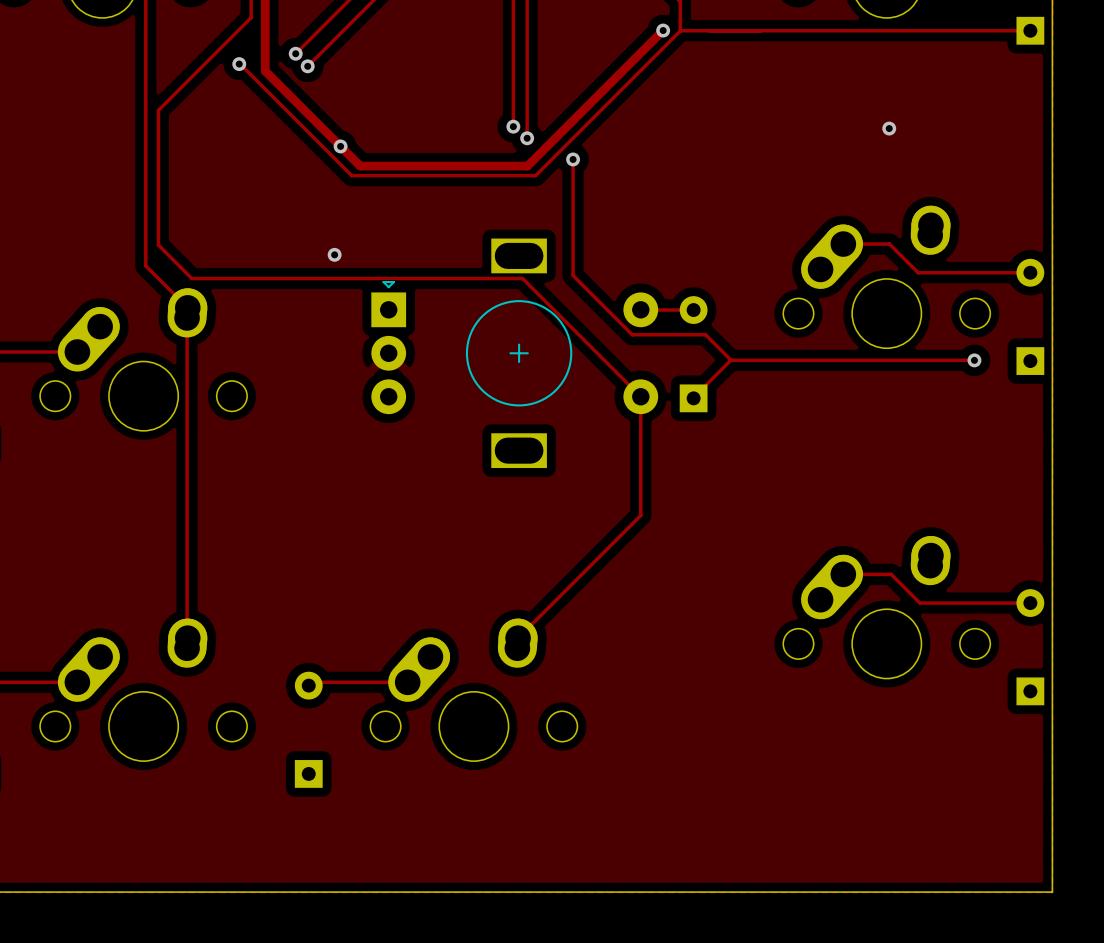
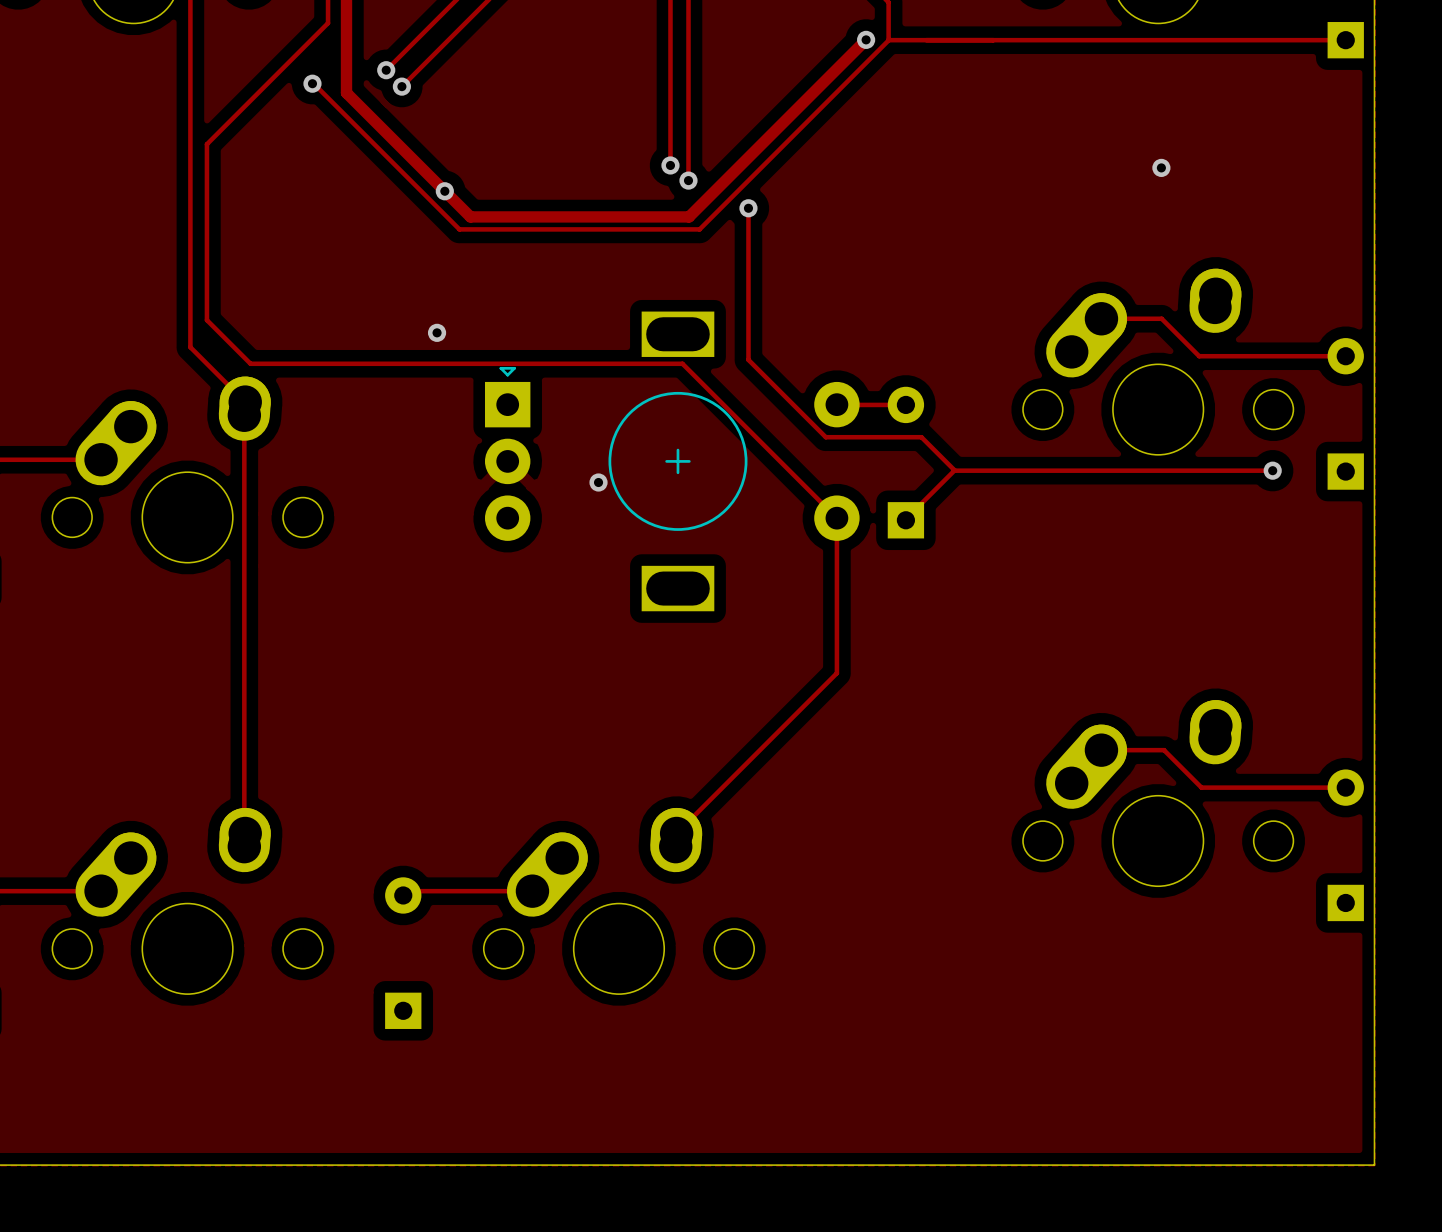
via: none -> (598, 482)

